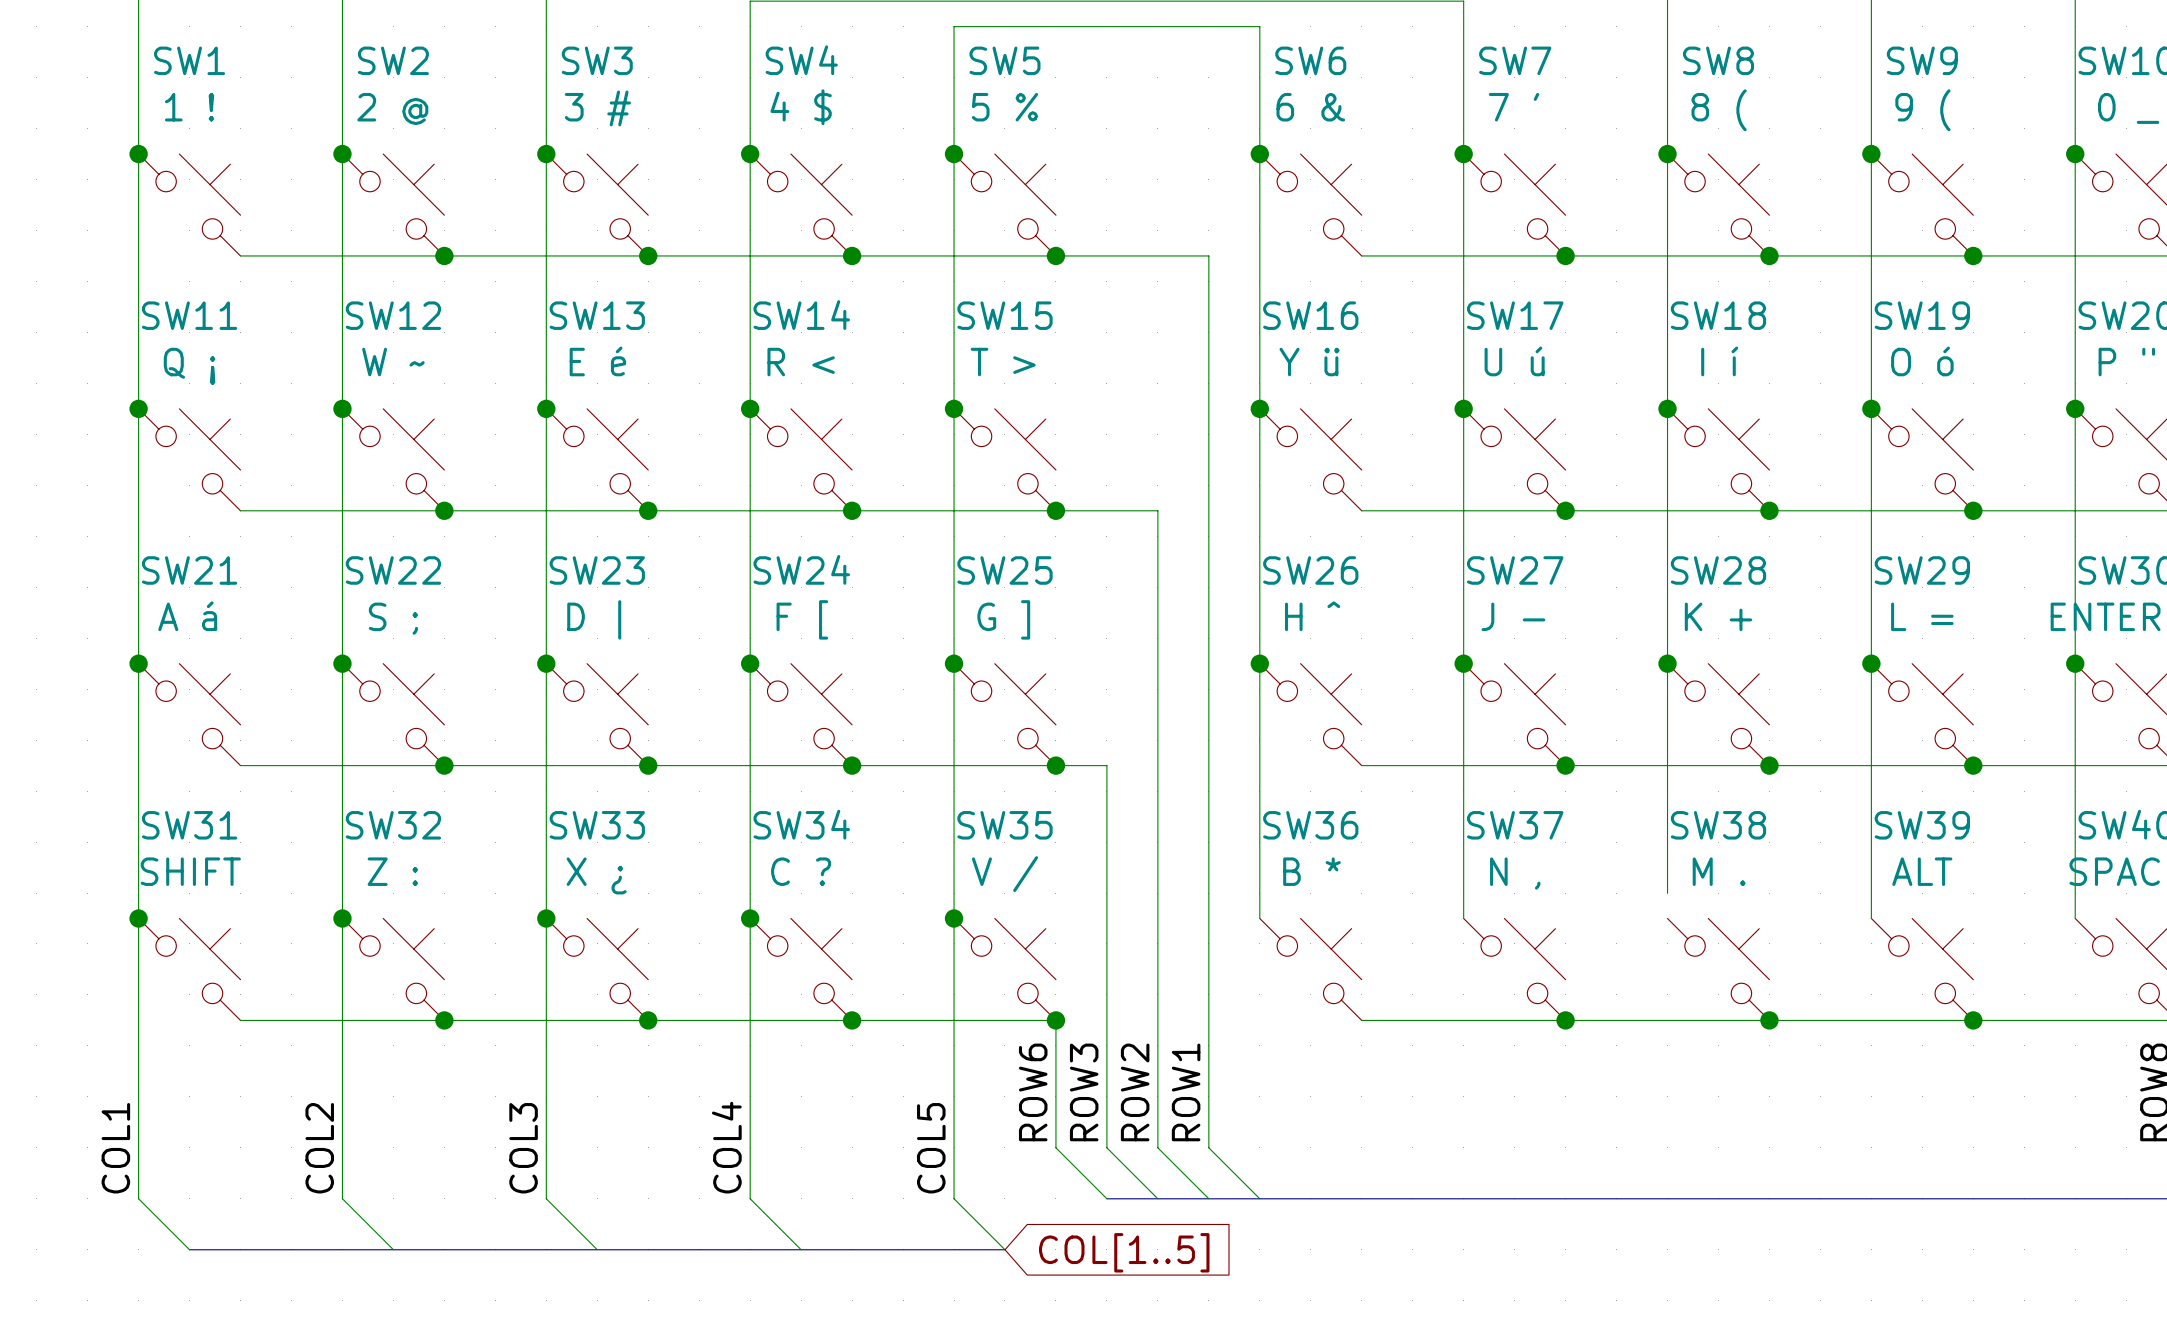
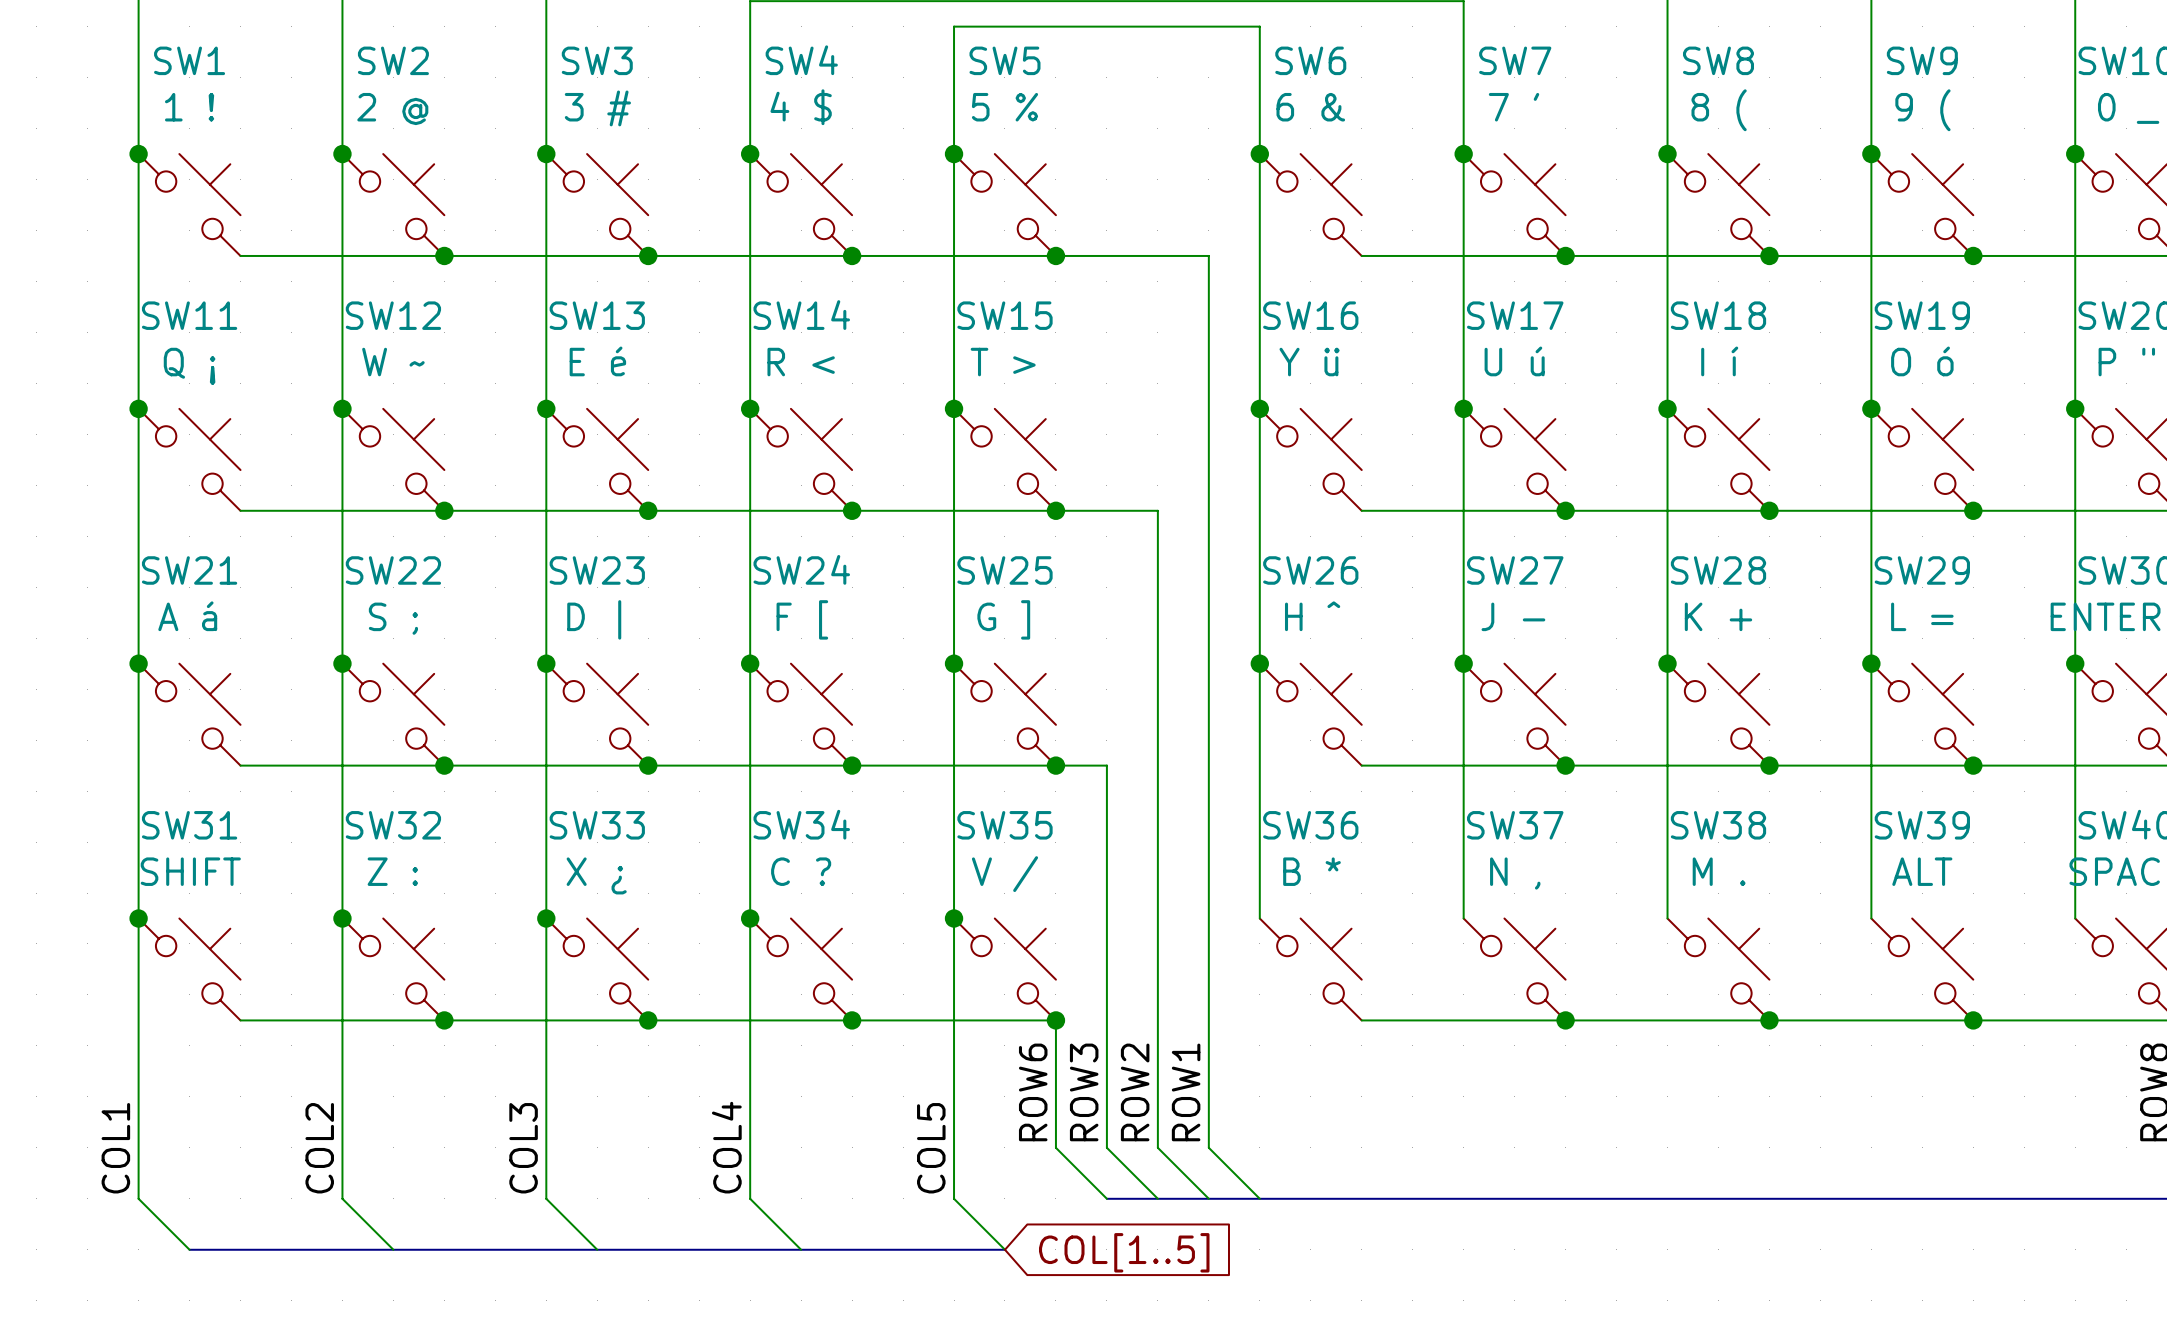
wire: none -> (1667, 893) (1667, 918)

